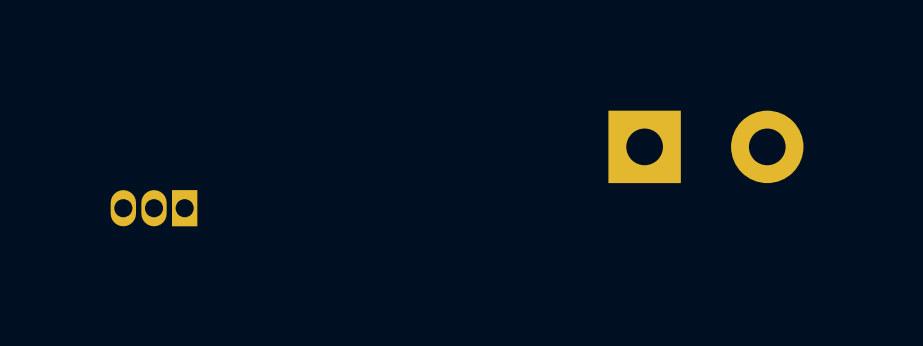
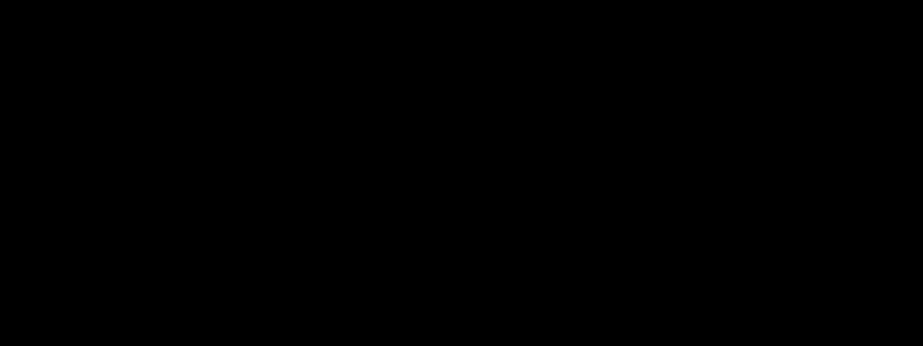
part: (705, 146) -> none
part: (154, 208) -> none

